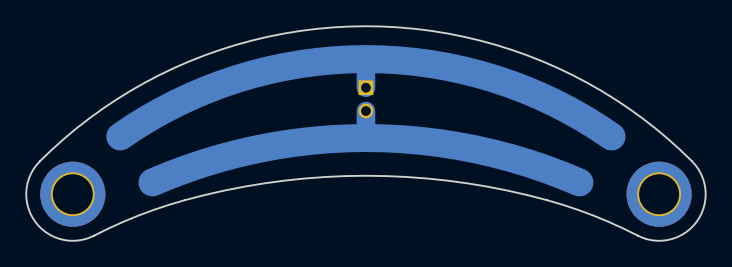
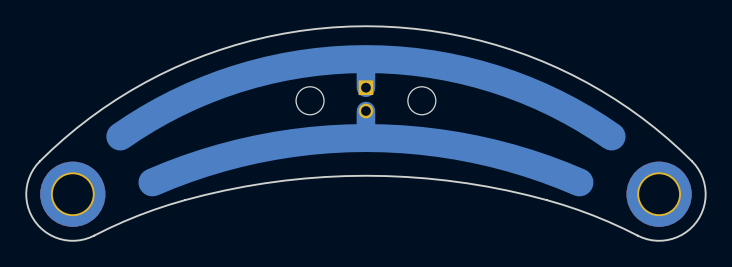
round board edge: none -> [295, 86, 325, 115]
round board edge: none -> [407, 86, 437, 115]

